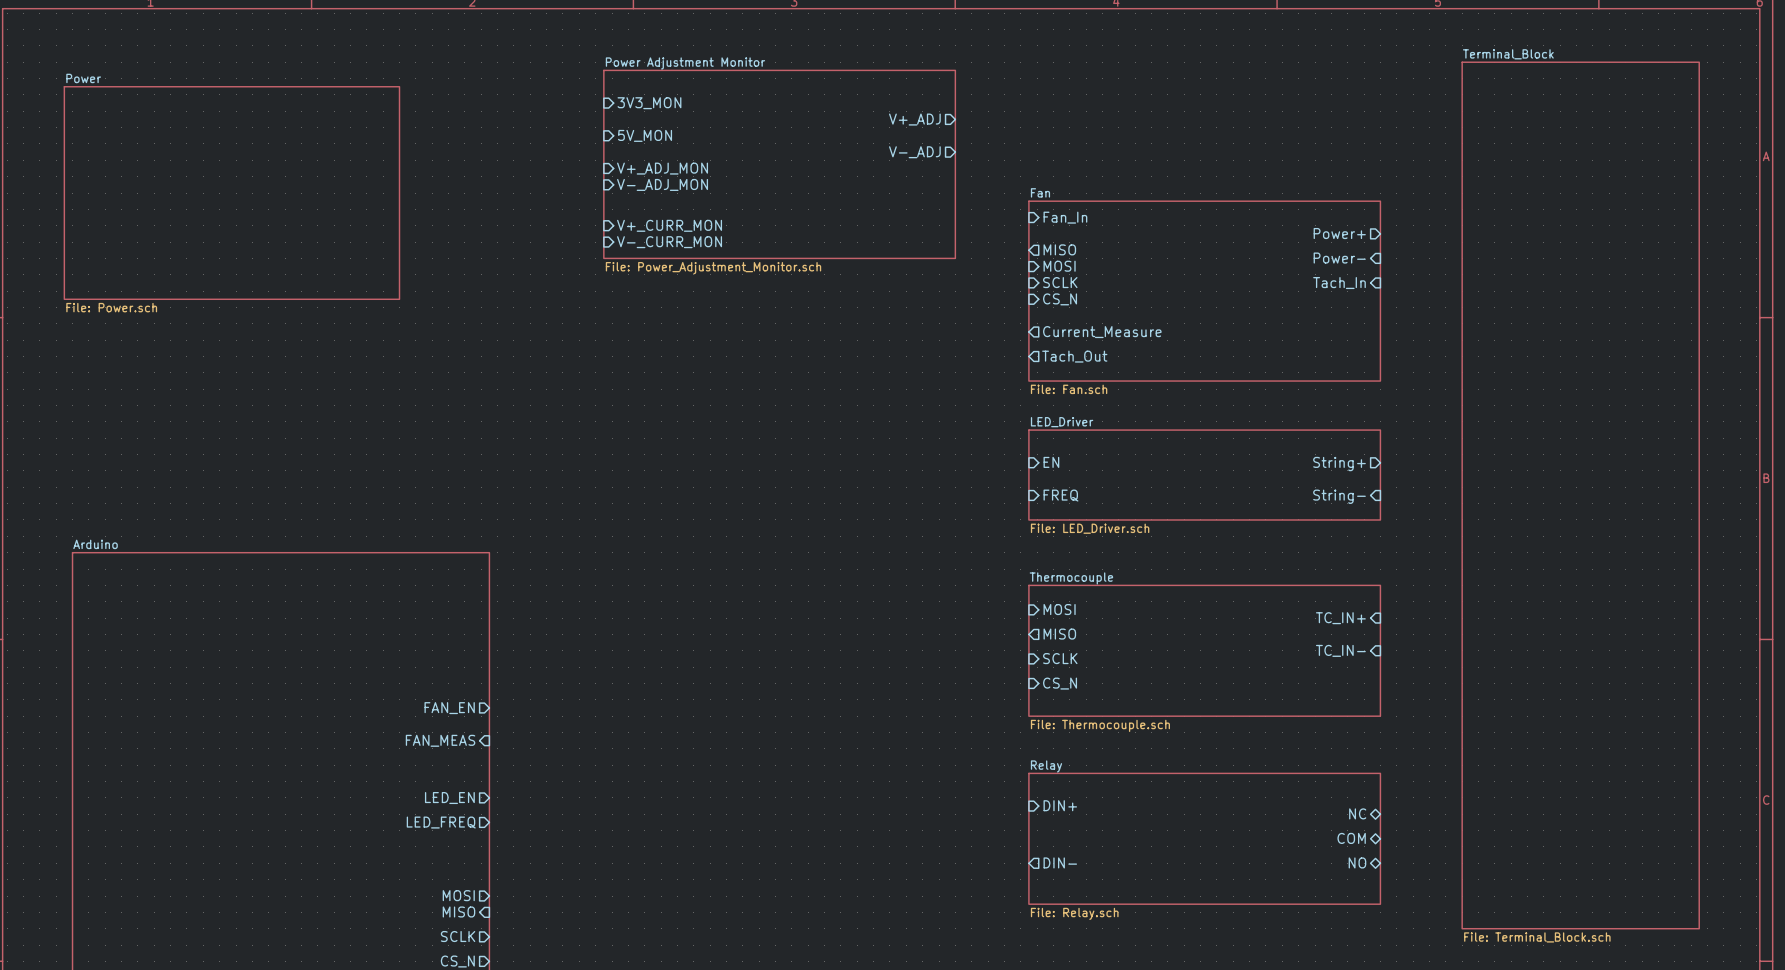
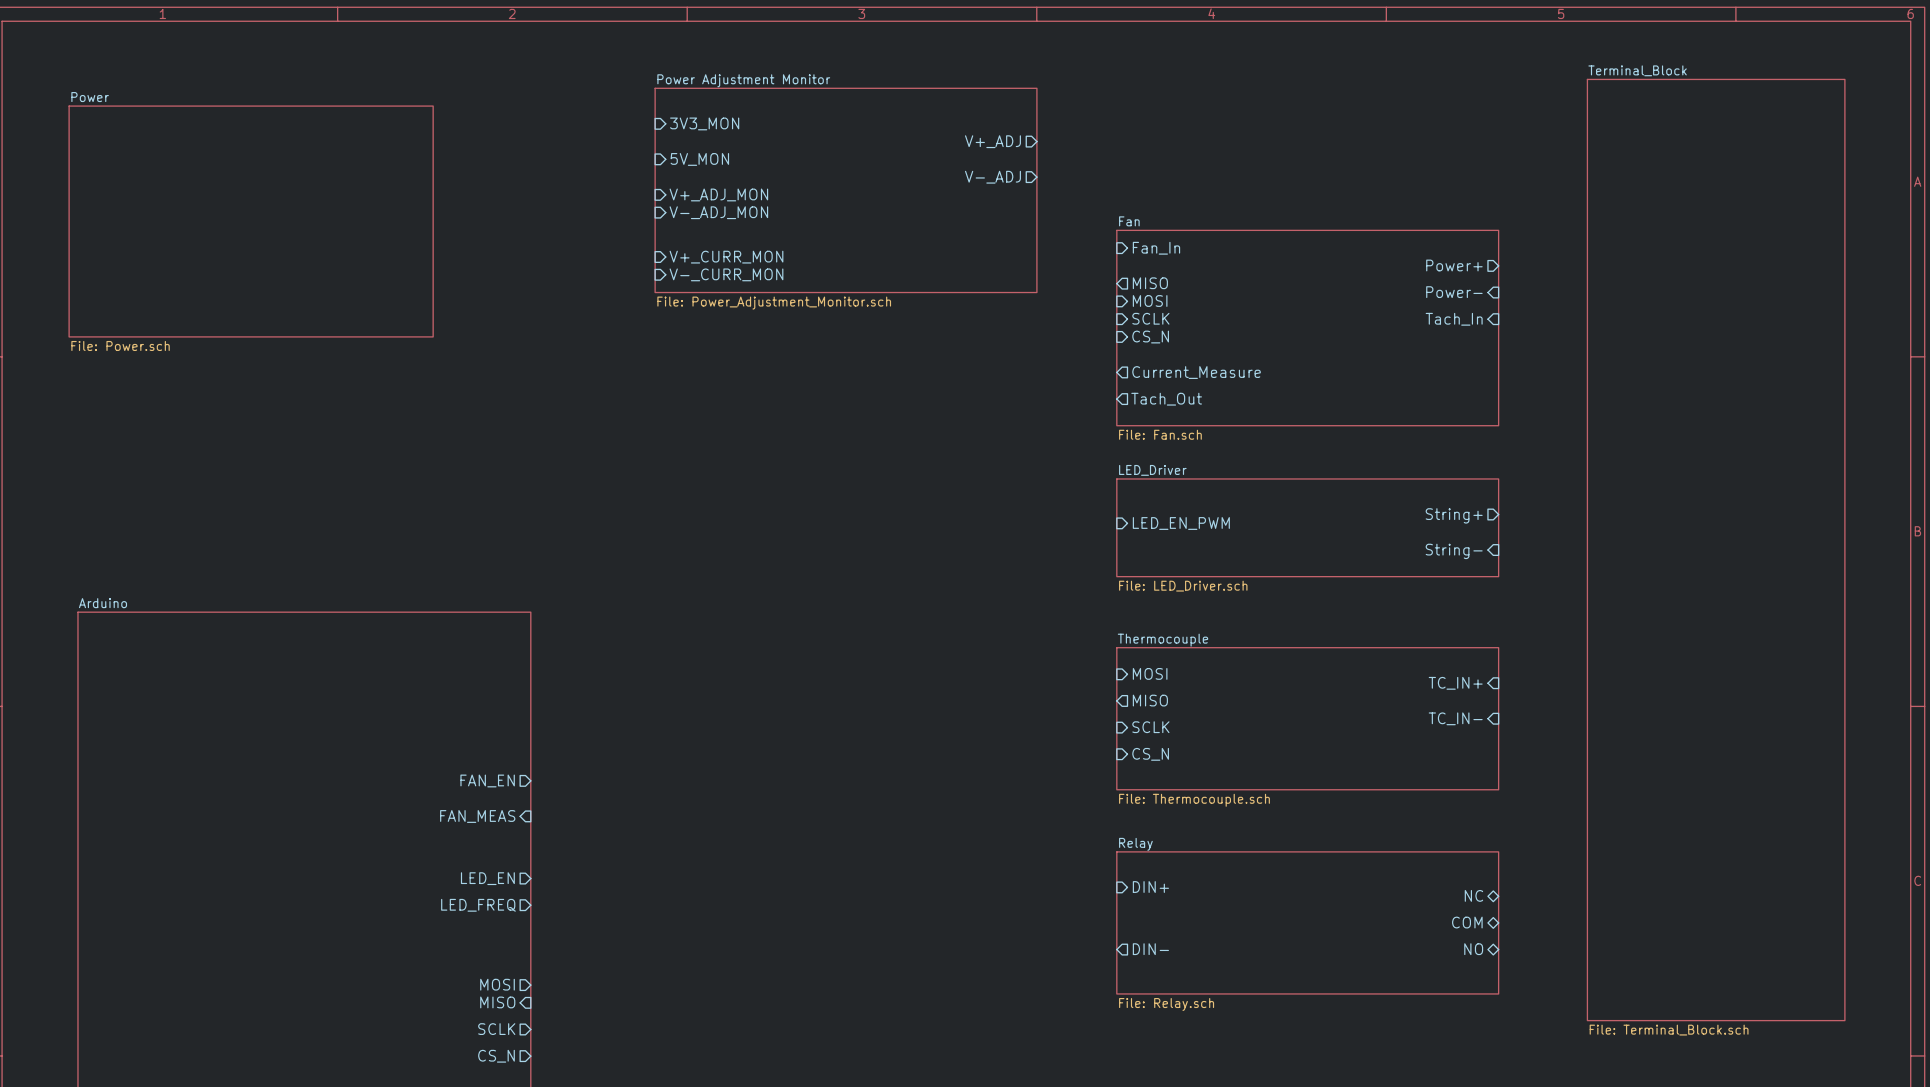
sheet pin: EN (1051, 462) -> none
sheet pin: none -> LED_EN_PWM (1181, 523)
sheet pin: FREQ (1060, 495) -> none

